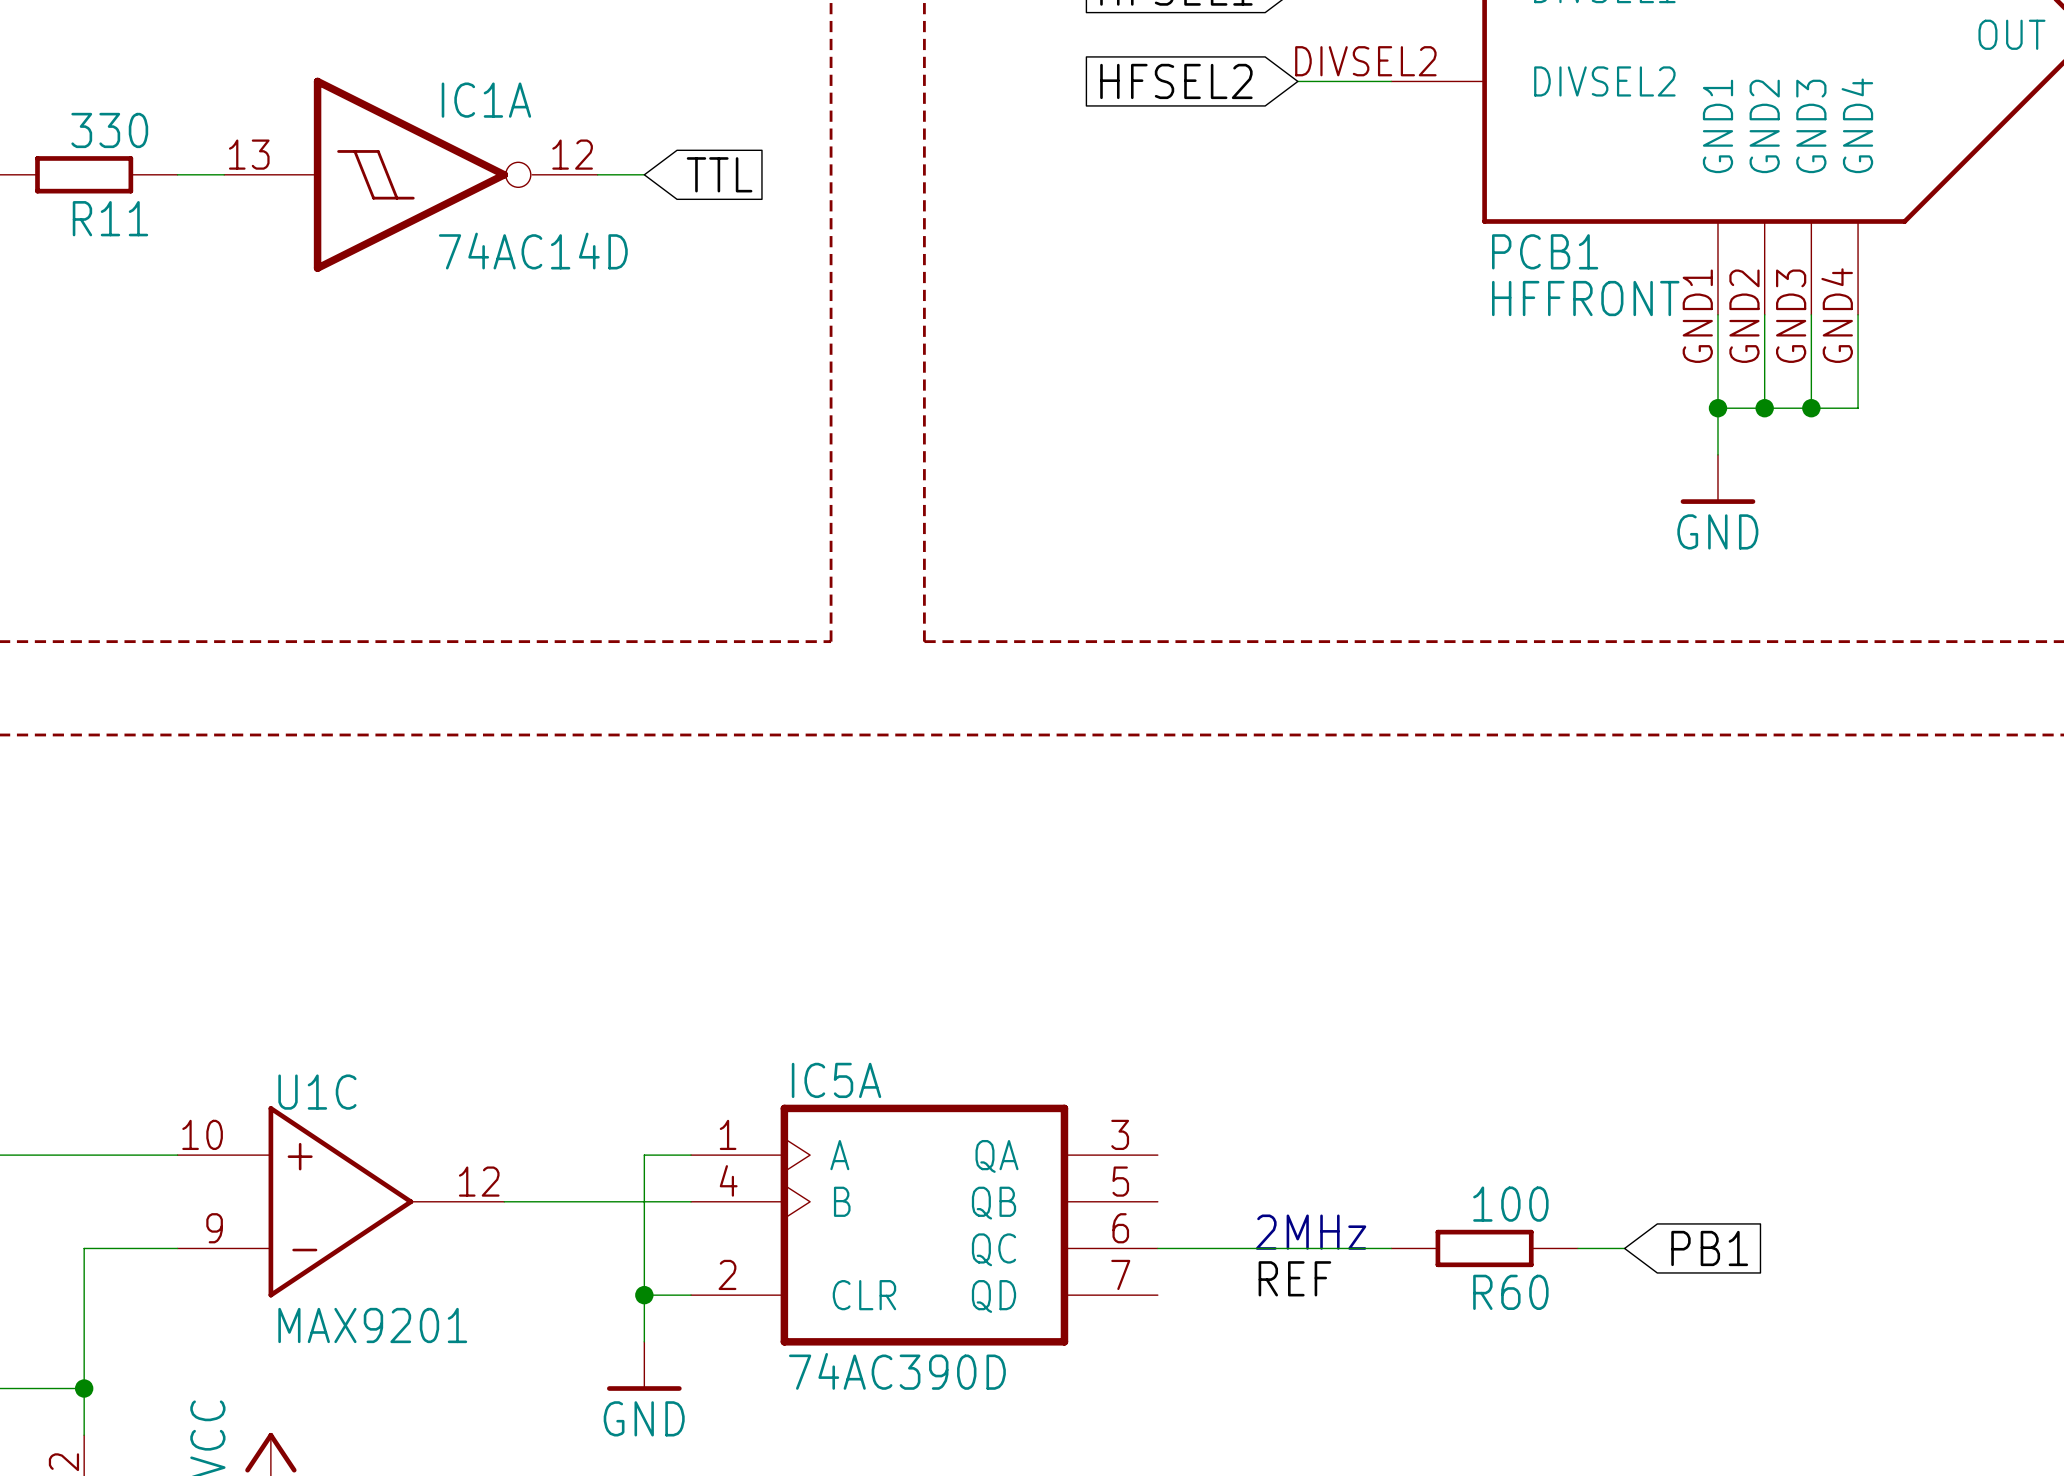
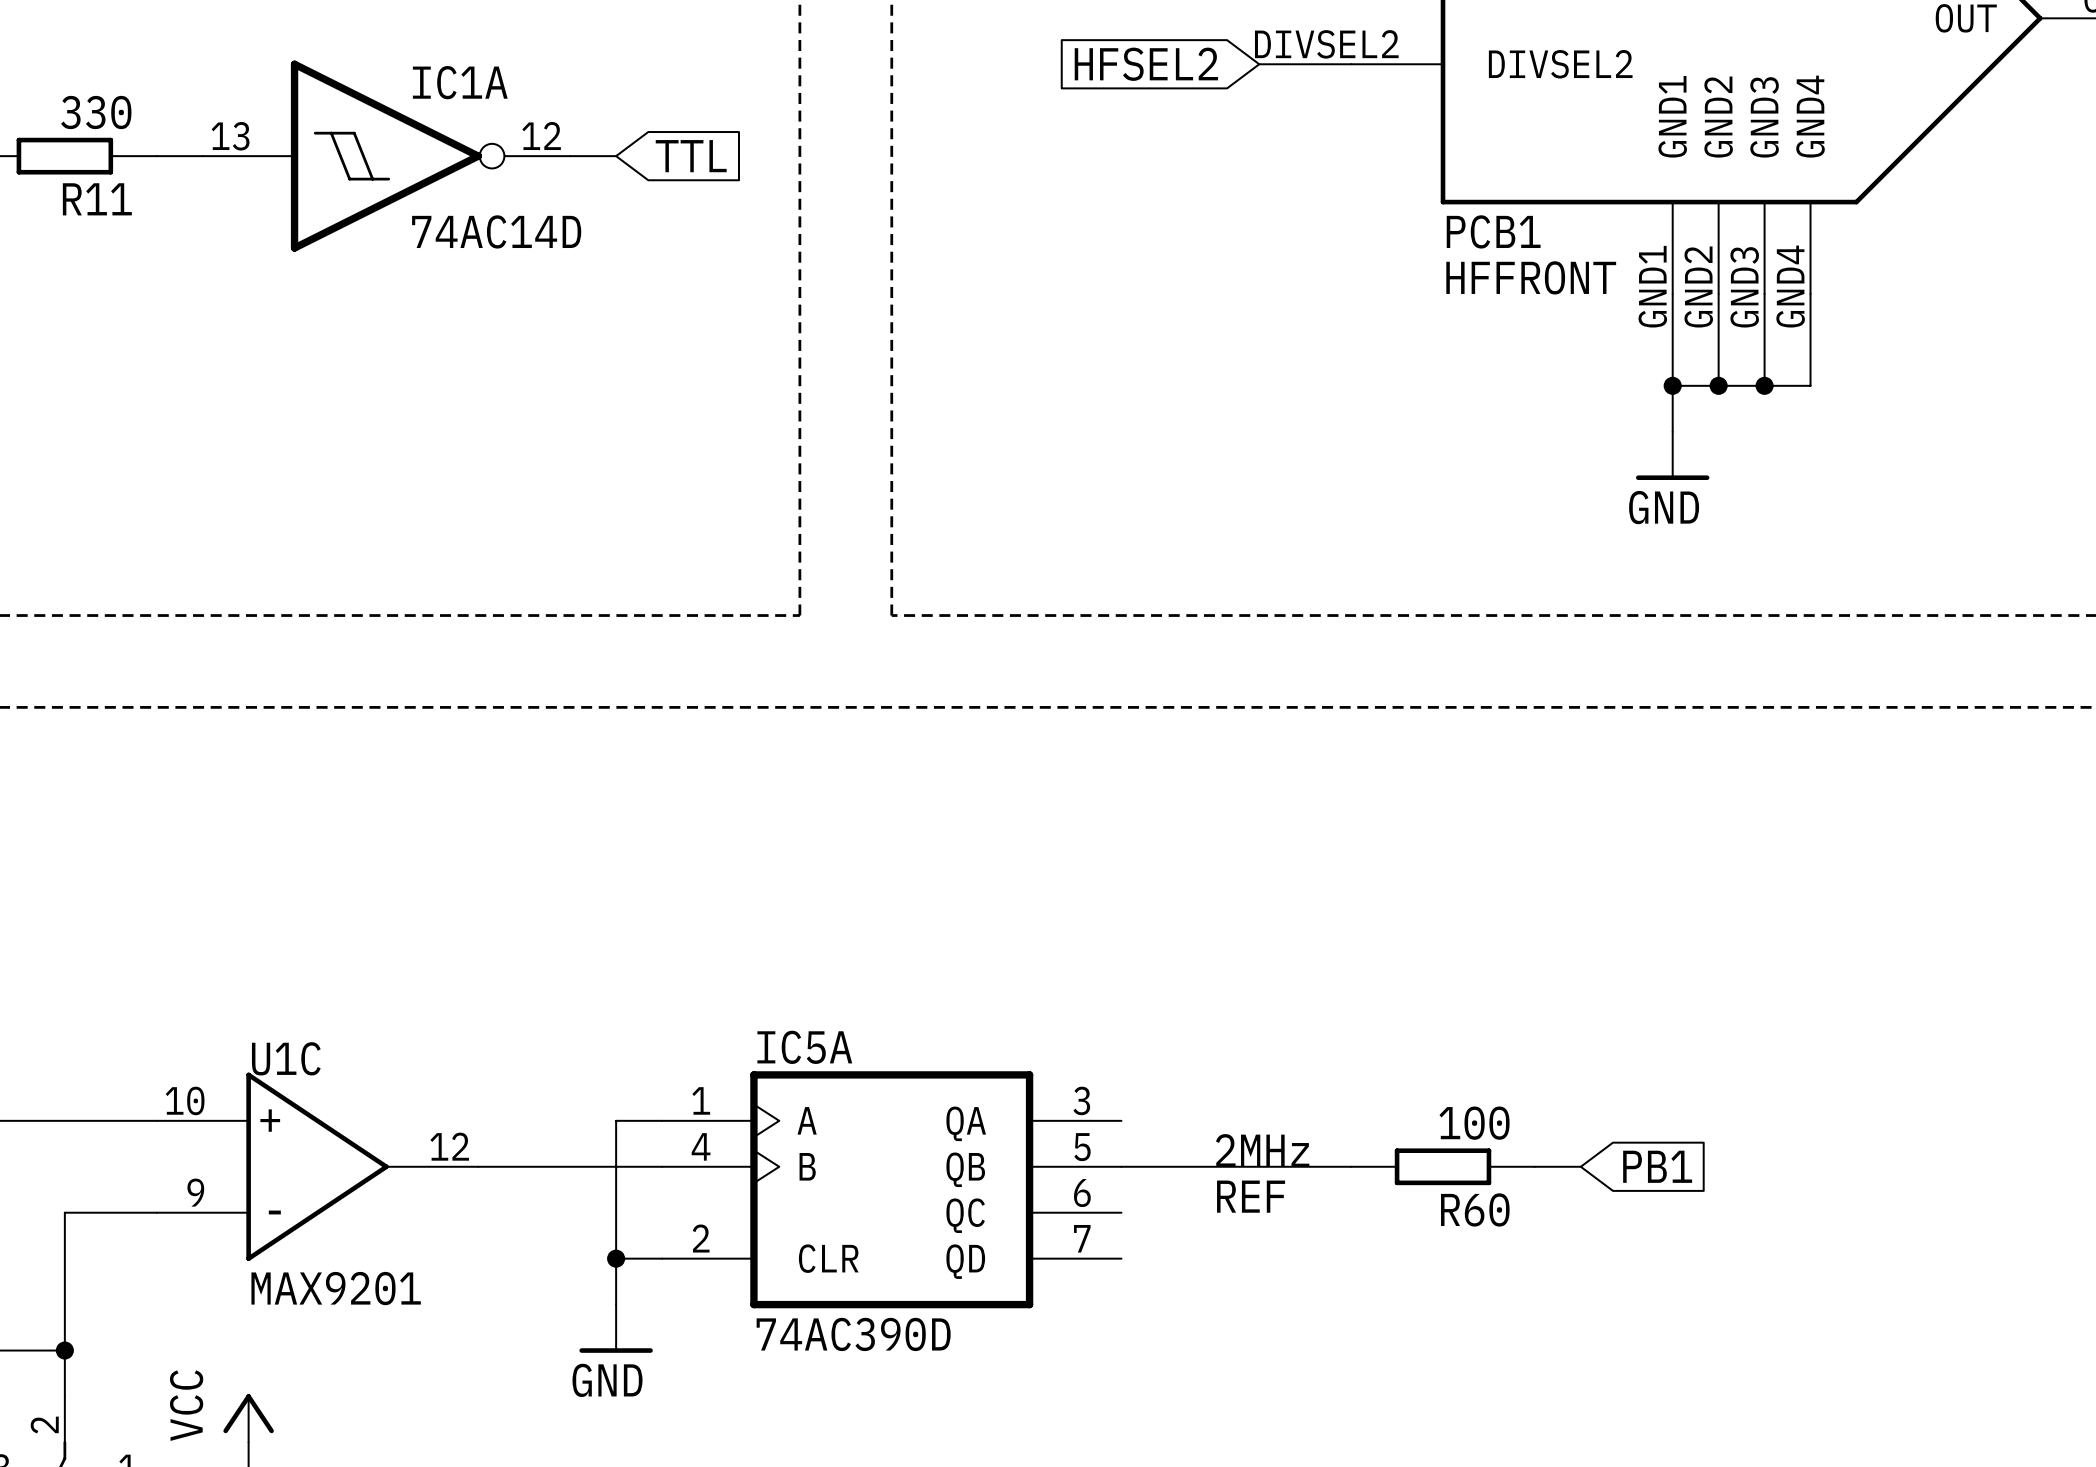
text position: 2MHz (1311, 1232) -> 2MHz (1262, 1150)
wire: (1157, 1248) (1391, 1248) -> (1121, 1166) (1351, 1166)
R60 position: (1484, 1248) -> (1443, 1166)
wire: (1577, 1248) (1624, 1248) -> (1534, 1166) (1580, 1166)
global label position: PB1 (1709, 1248) -> PB1 (1657, 1166)
label position: REF (1294, 1278) -> REF (1251, 1196)

